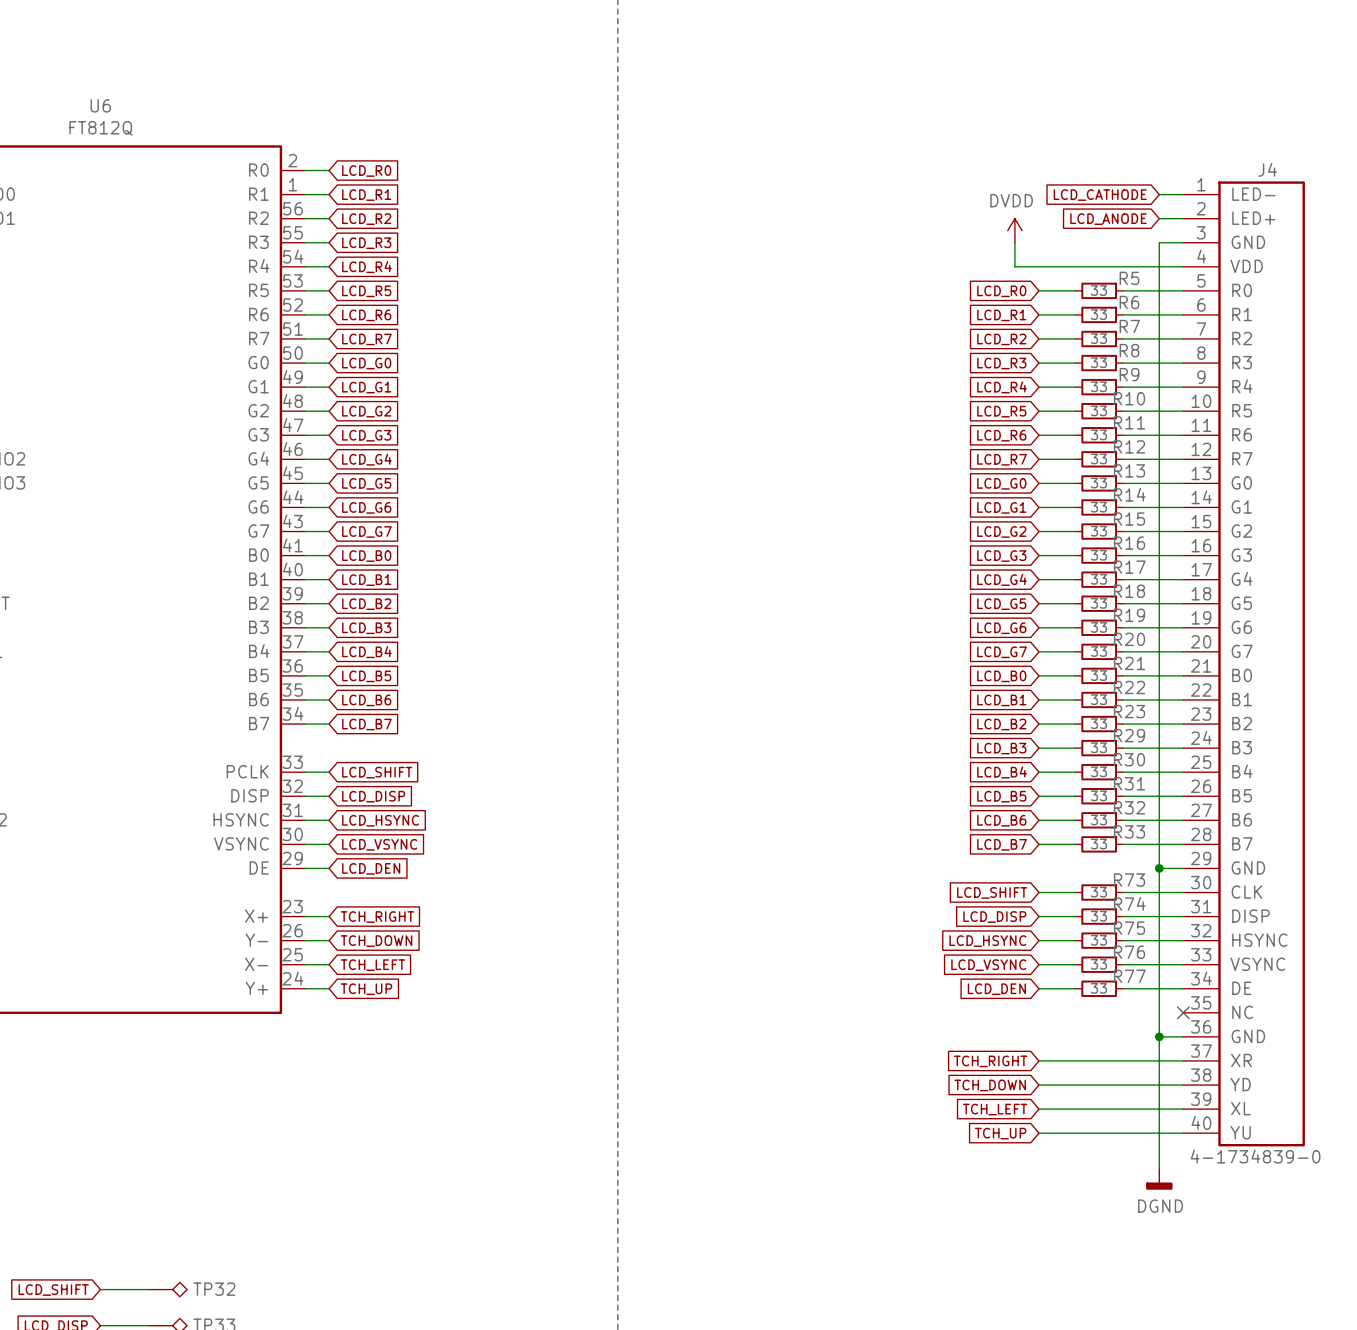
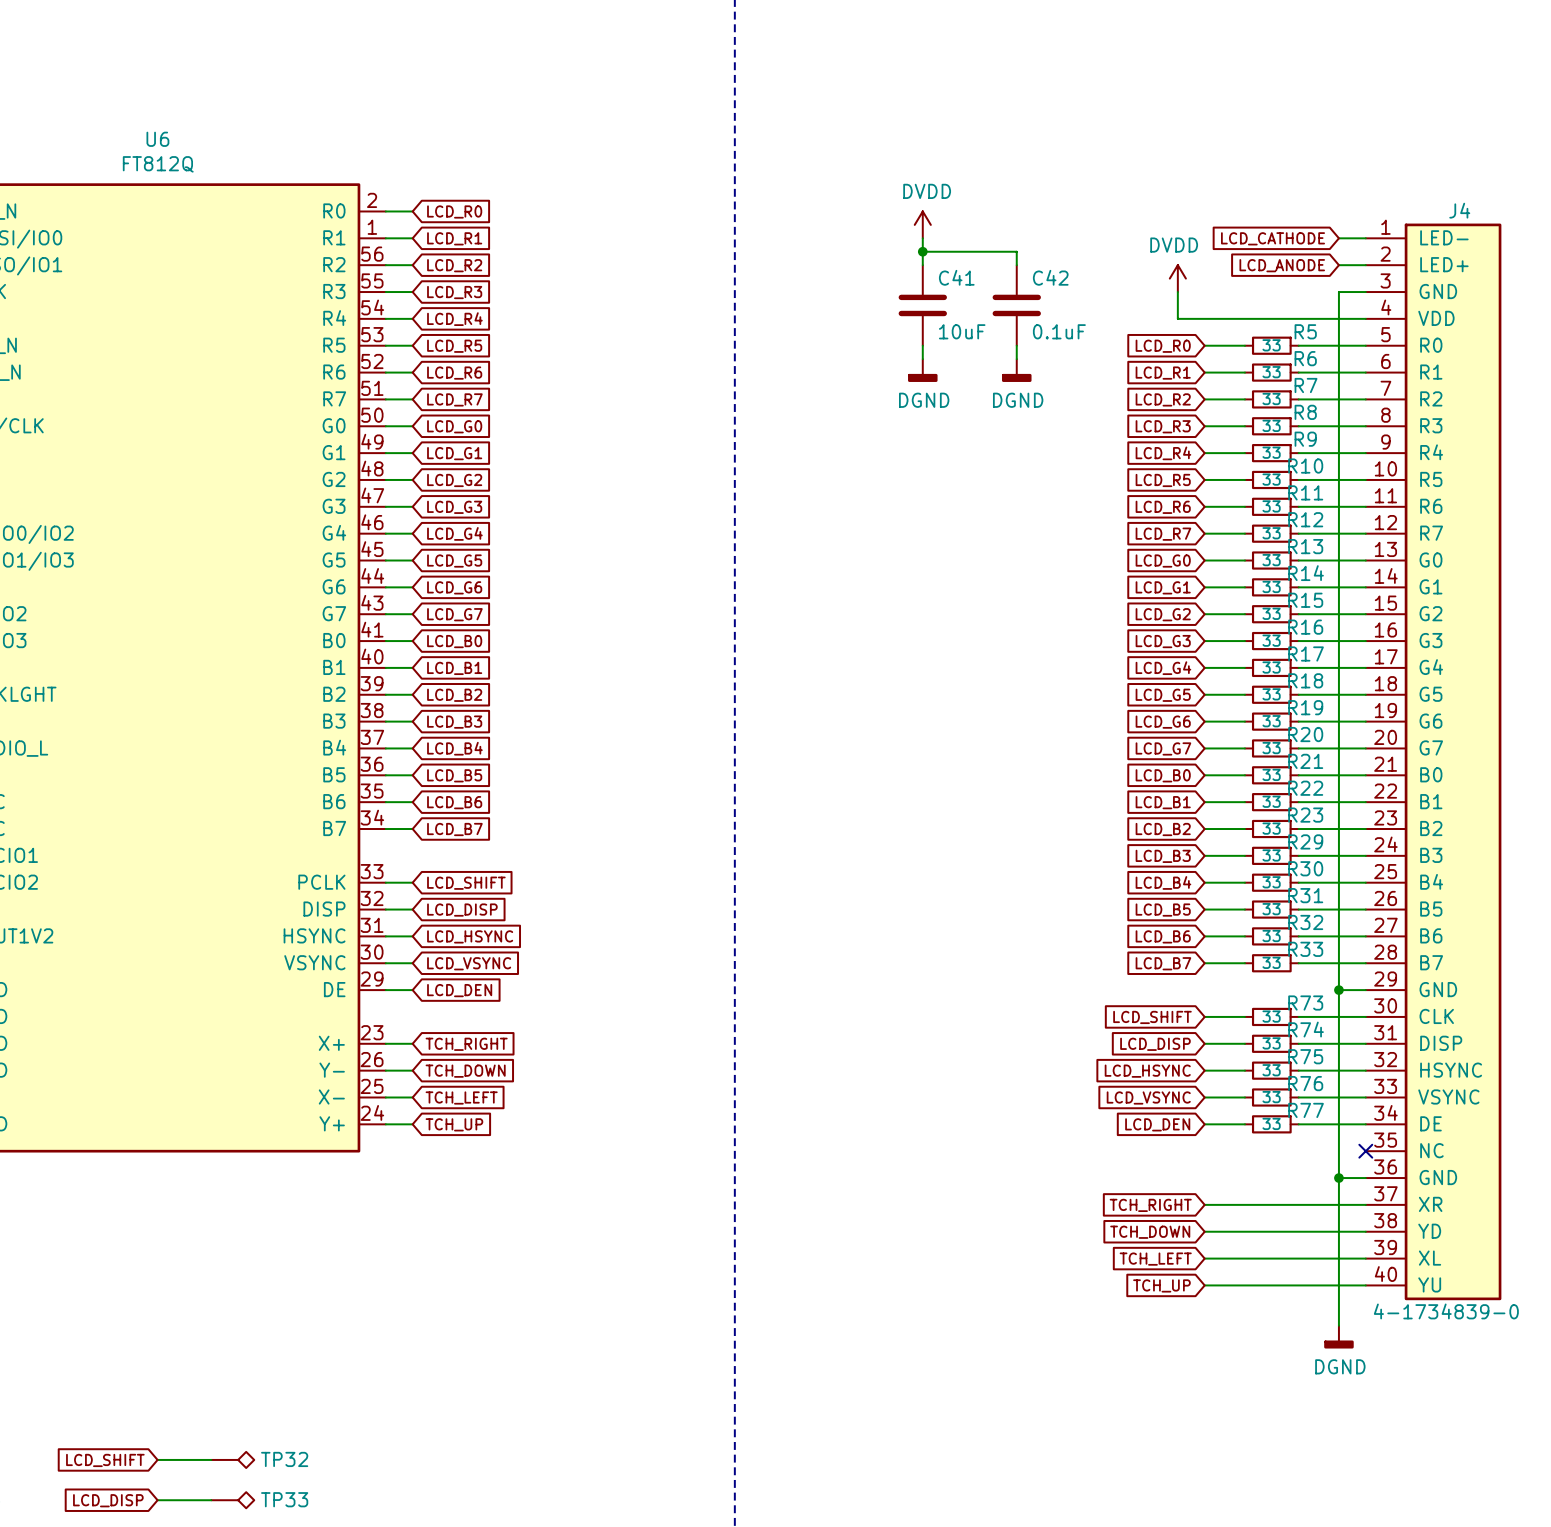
power symbol: none -> DVDD (922, 224)
wire: none -> (922, 238) (922, 265)
wire: none -> (922, 251) (1016, 251) (1016, 265)
junction: none -> (922, 251)
C41: none -> 10uF (922, 305)
C42: none -> 0.1uF (1016, 305)
wire: none -> (922, 345) (922, 359)
wire: none -> (1016, 345) (1016, 359)
power symbol: none -> DGND (922, 370)
power symbol: none -> DGND (1016, 370)

